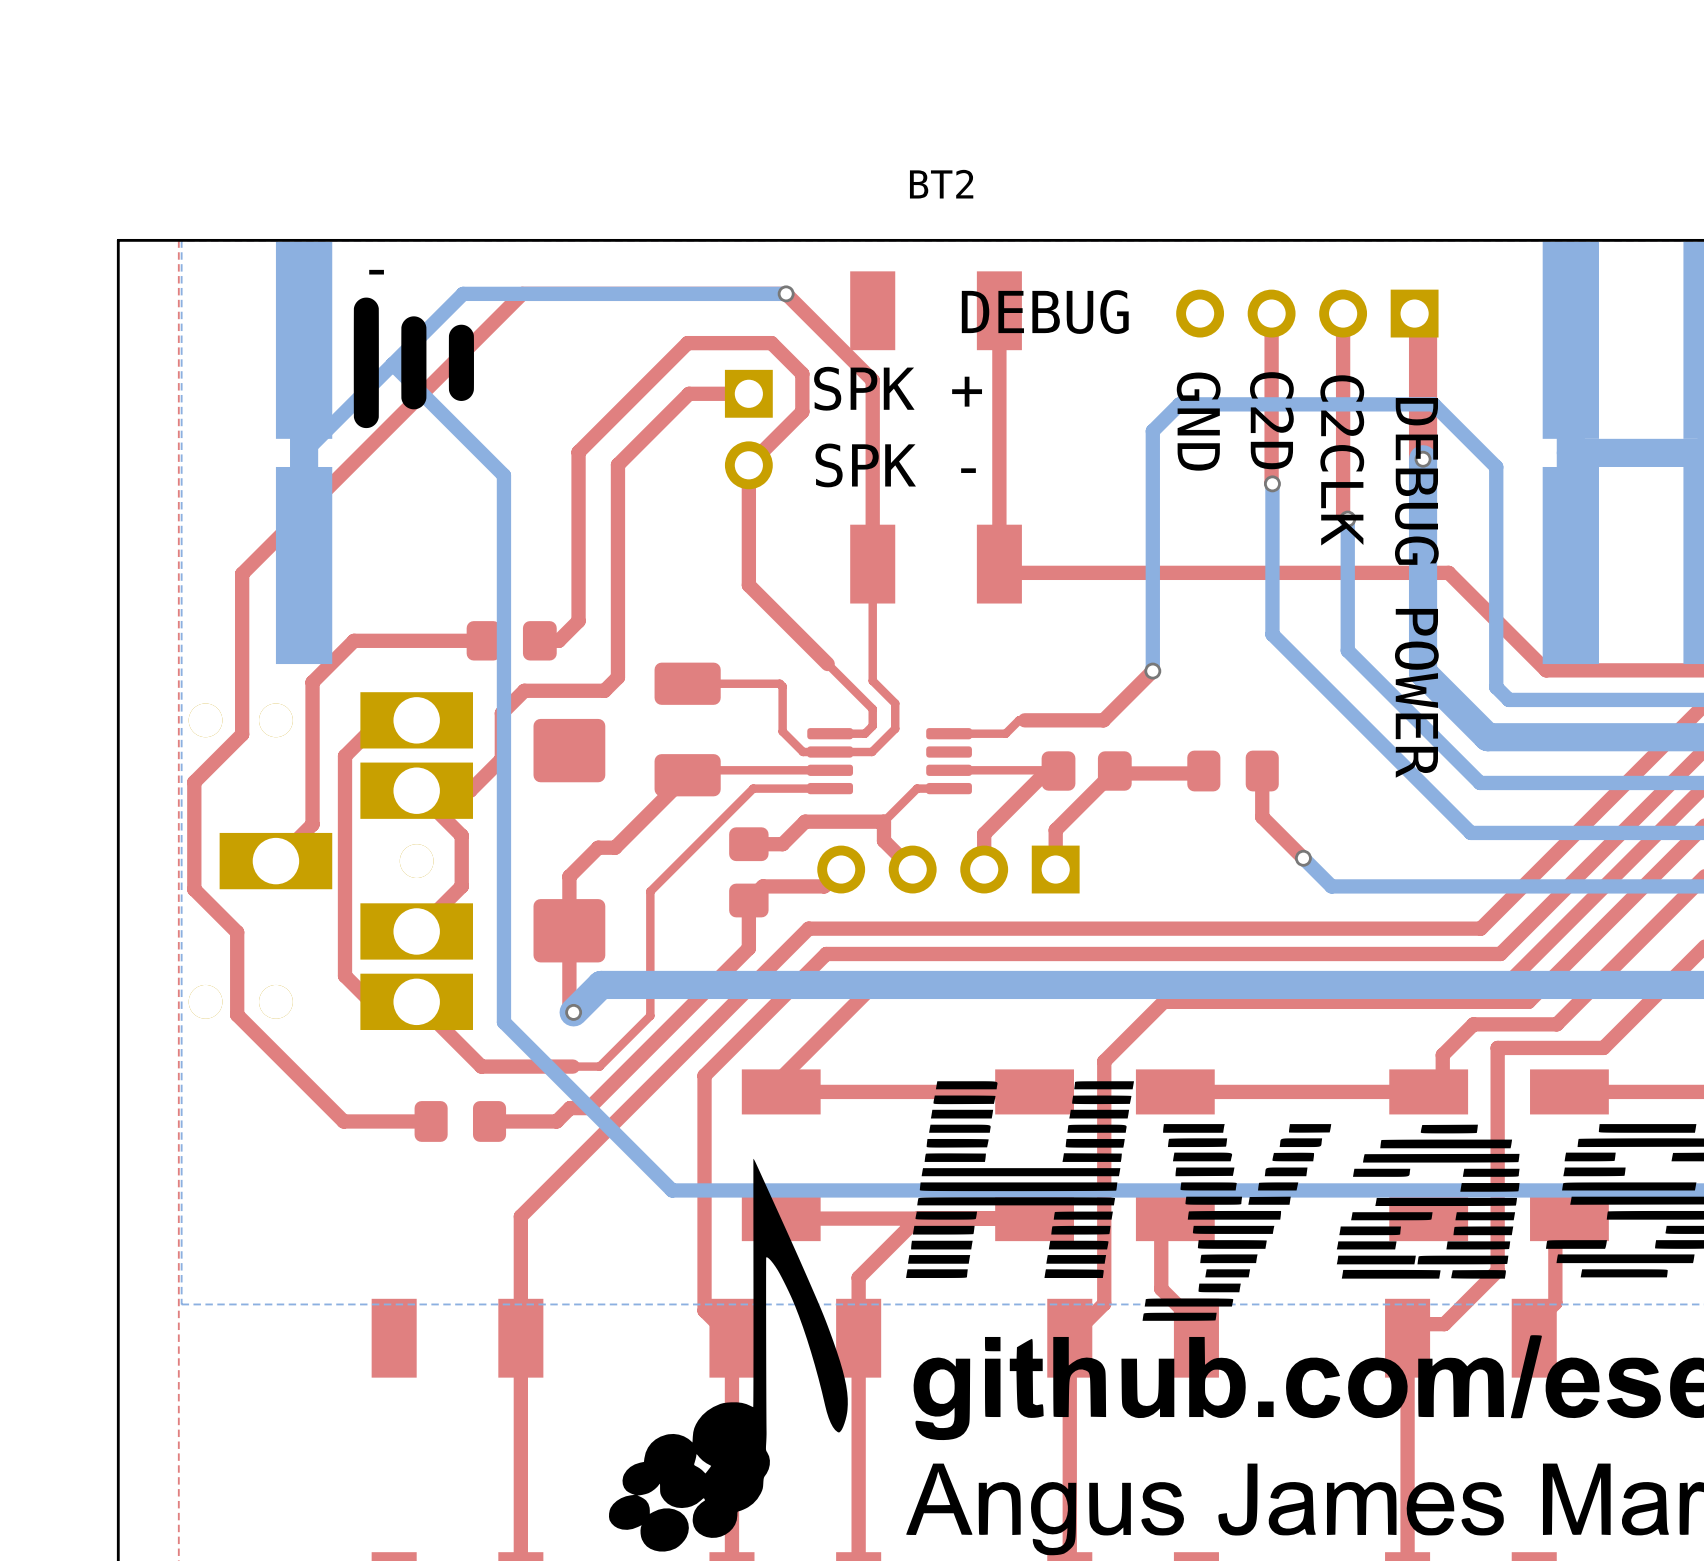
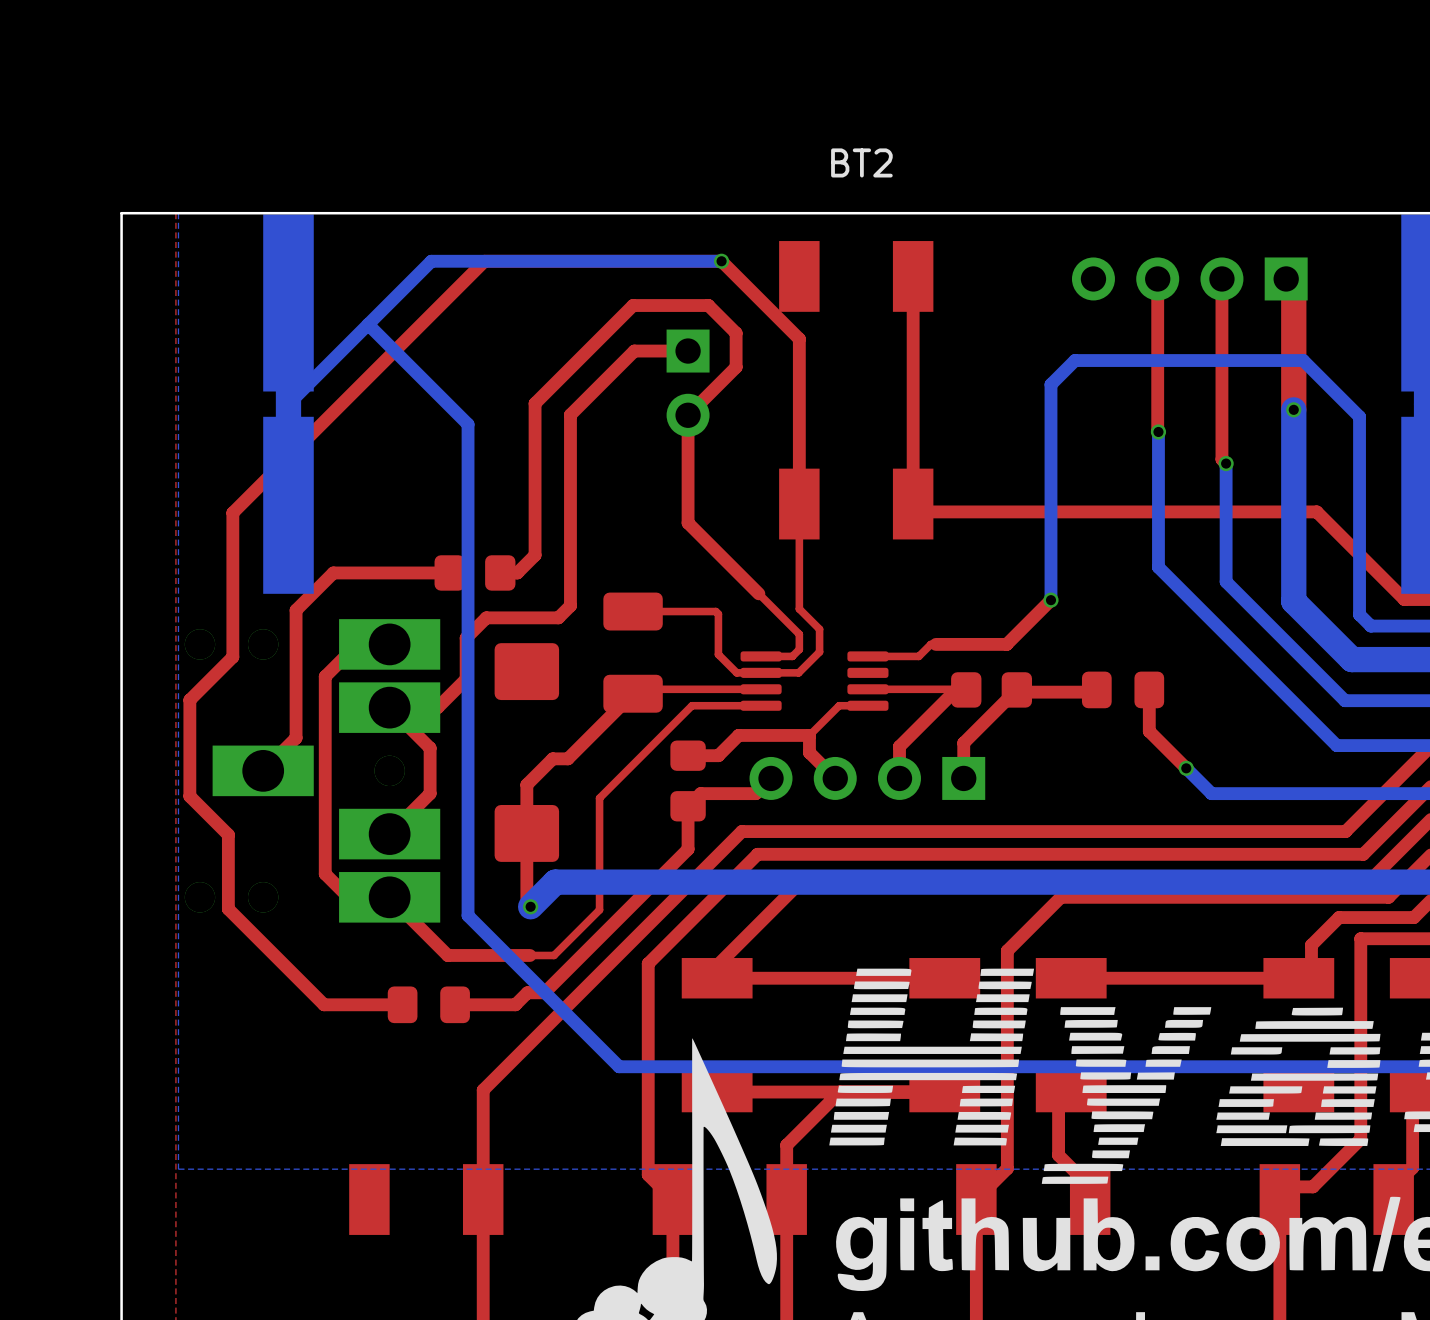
text: - (376, 272) -> none
drawing: [353, 297, 474, 429] -> none
text: DEBUG (1045, 312) -> none
text: SPK + (898, 388) -> none
text: C2D (1271, 420) -> none
text: GND (1198, 421) -> none
text: C2CLK (1342, 460) -> none
text: SPK - (895, 465) -> none
text: DEBUG POWER (1416, 587) -> none

